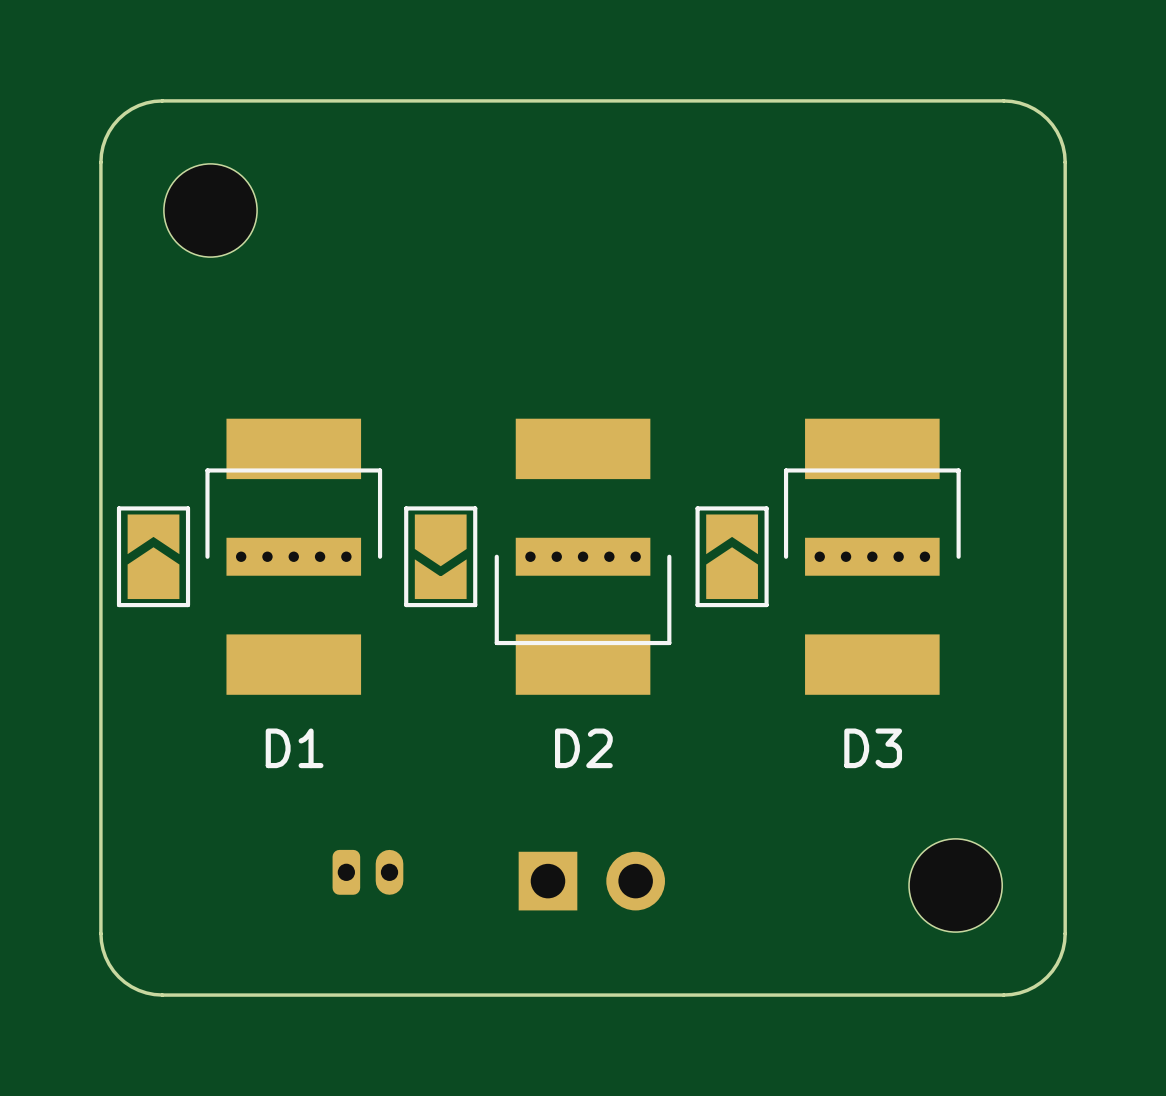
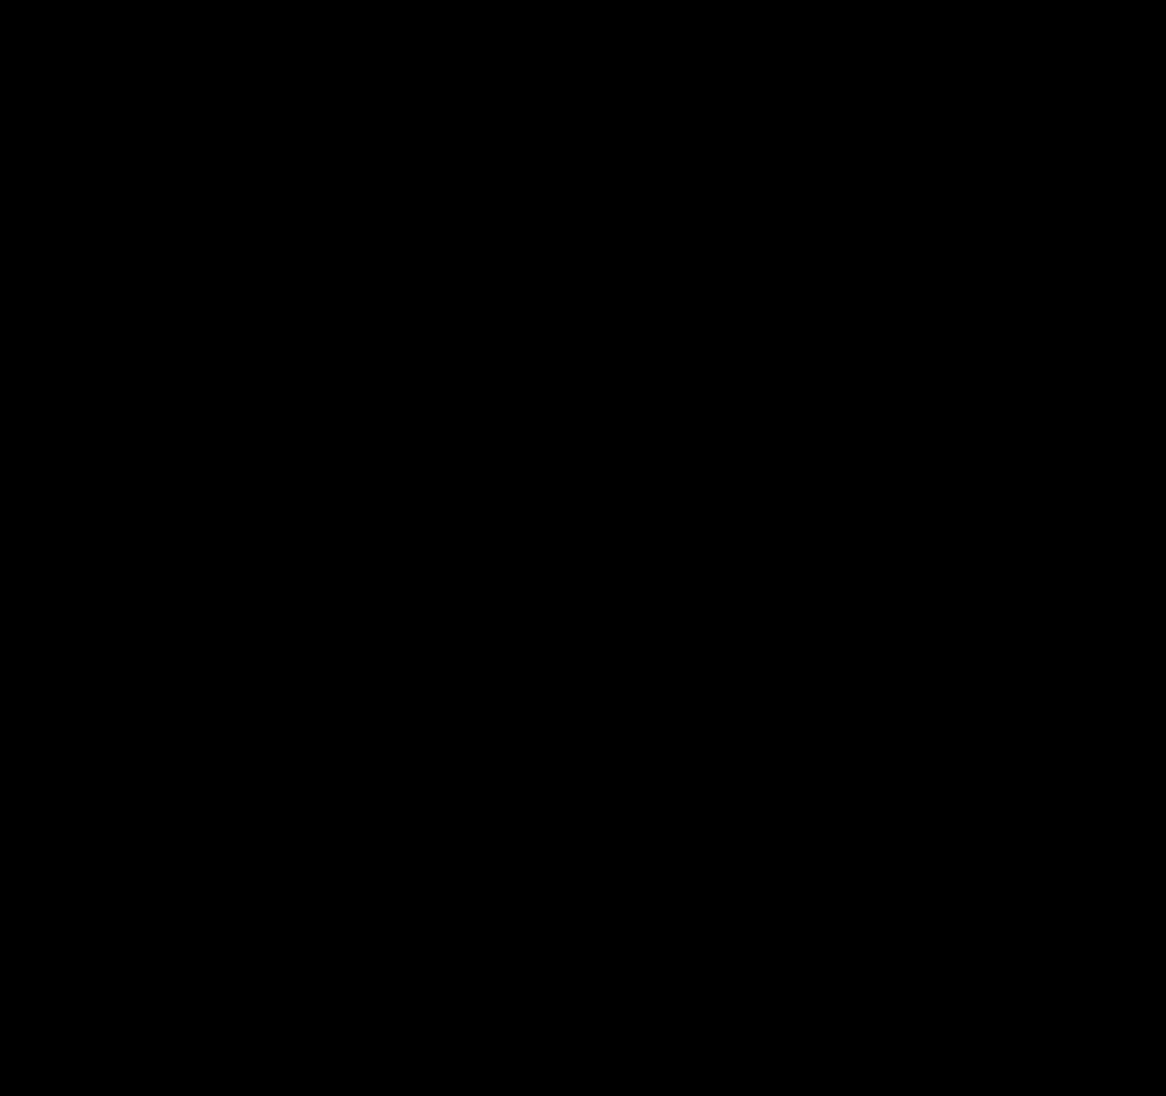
board edge: (162, 100) (1003, 100) (1027, 105) (1047, 118) (1060, 138) (1065, 162) (1065, 933) (1060, 957) (1047, 977) (1027, 990) (1003, 995) (162, 995) (138, 990) (118, 977) (105, 957) (100, 933) (100, 162) (105, 138) (118, 118) (138, 105) (162, 100) -> none
part: (210, 210) -> none
part: (153, 556) -> none
D1: (293, 556) -> none
part: (440, 556) -> none
D2: (583, 556) -> none
part: (732, 556) -> none
D3: (872, 556) -> none
part: (367, 872) -> none
part: (591, 881) -> none
part: (955, 885) -> none

